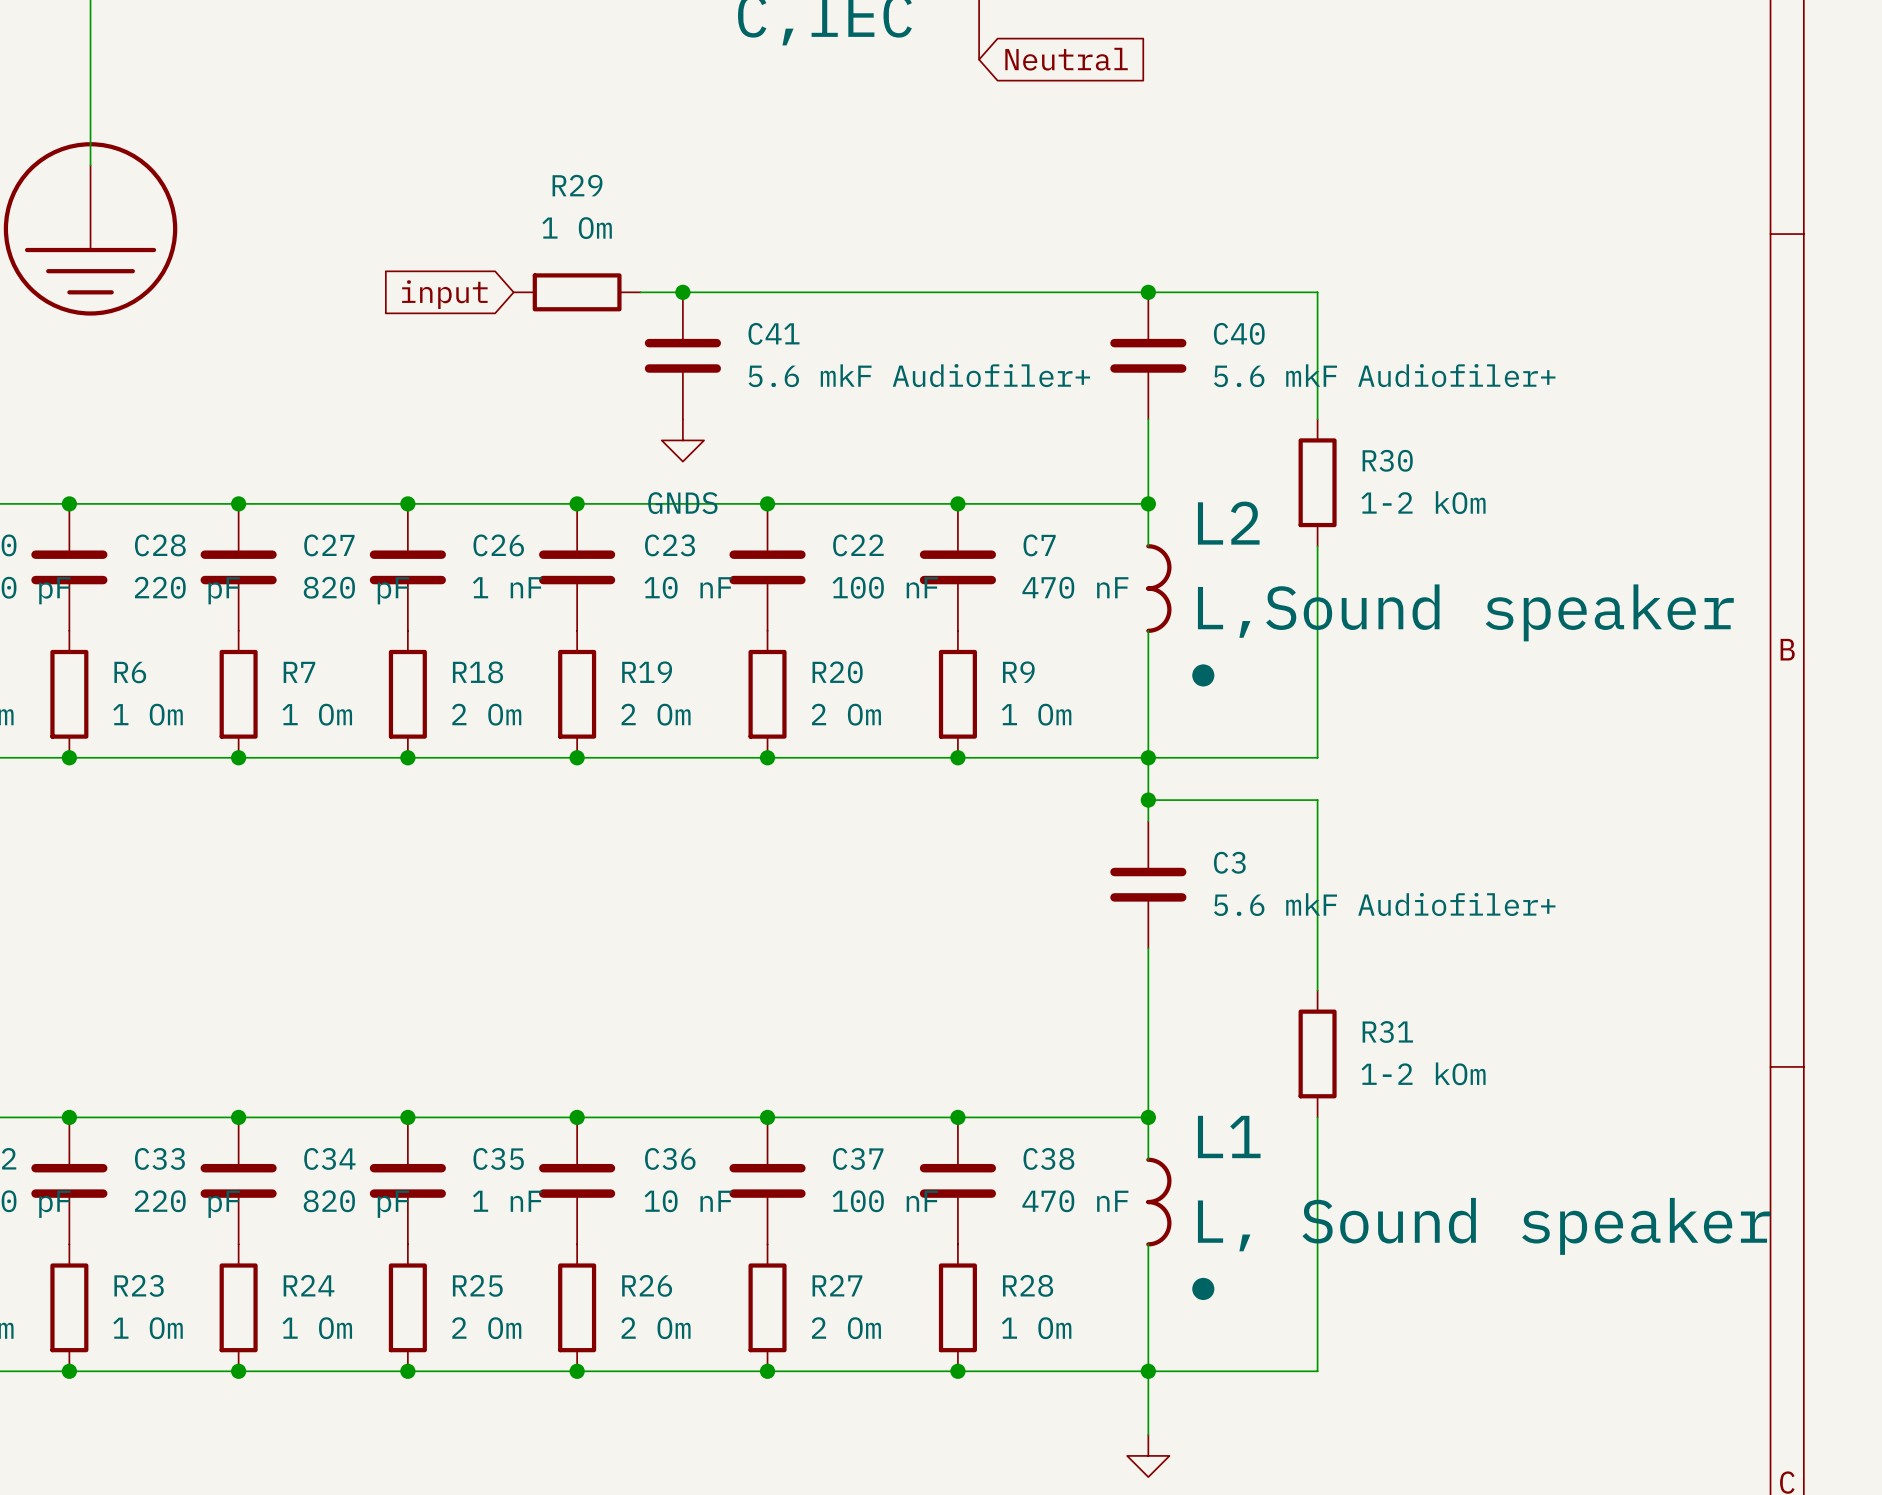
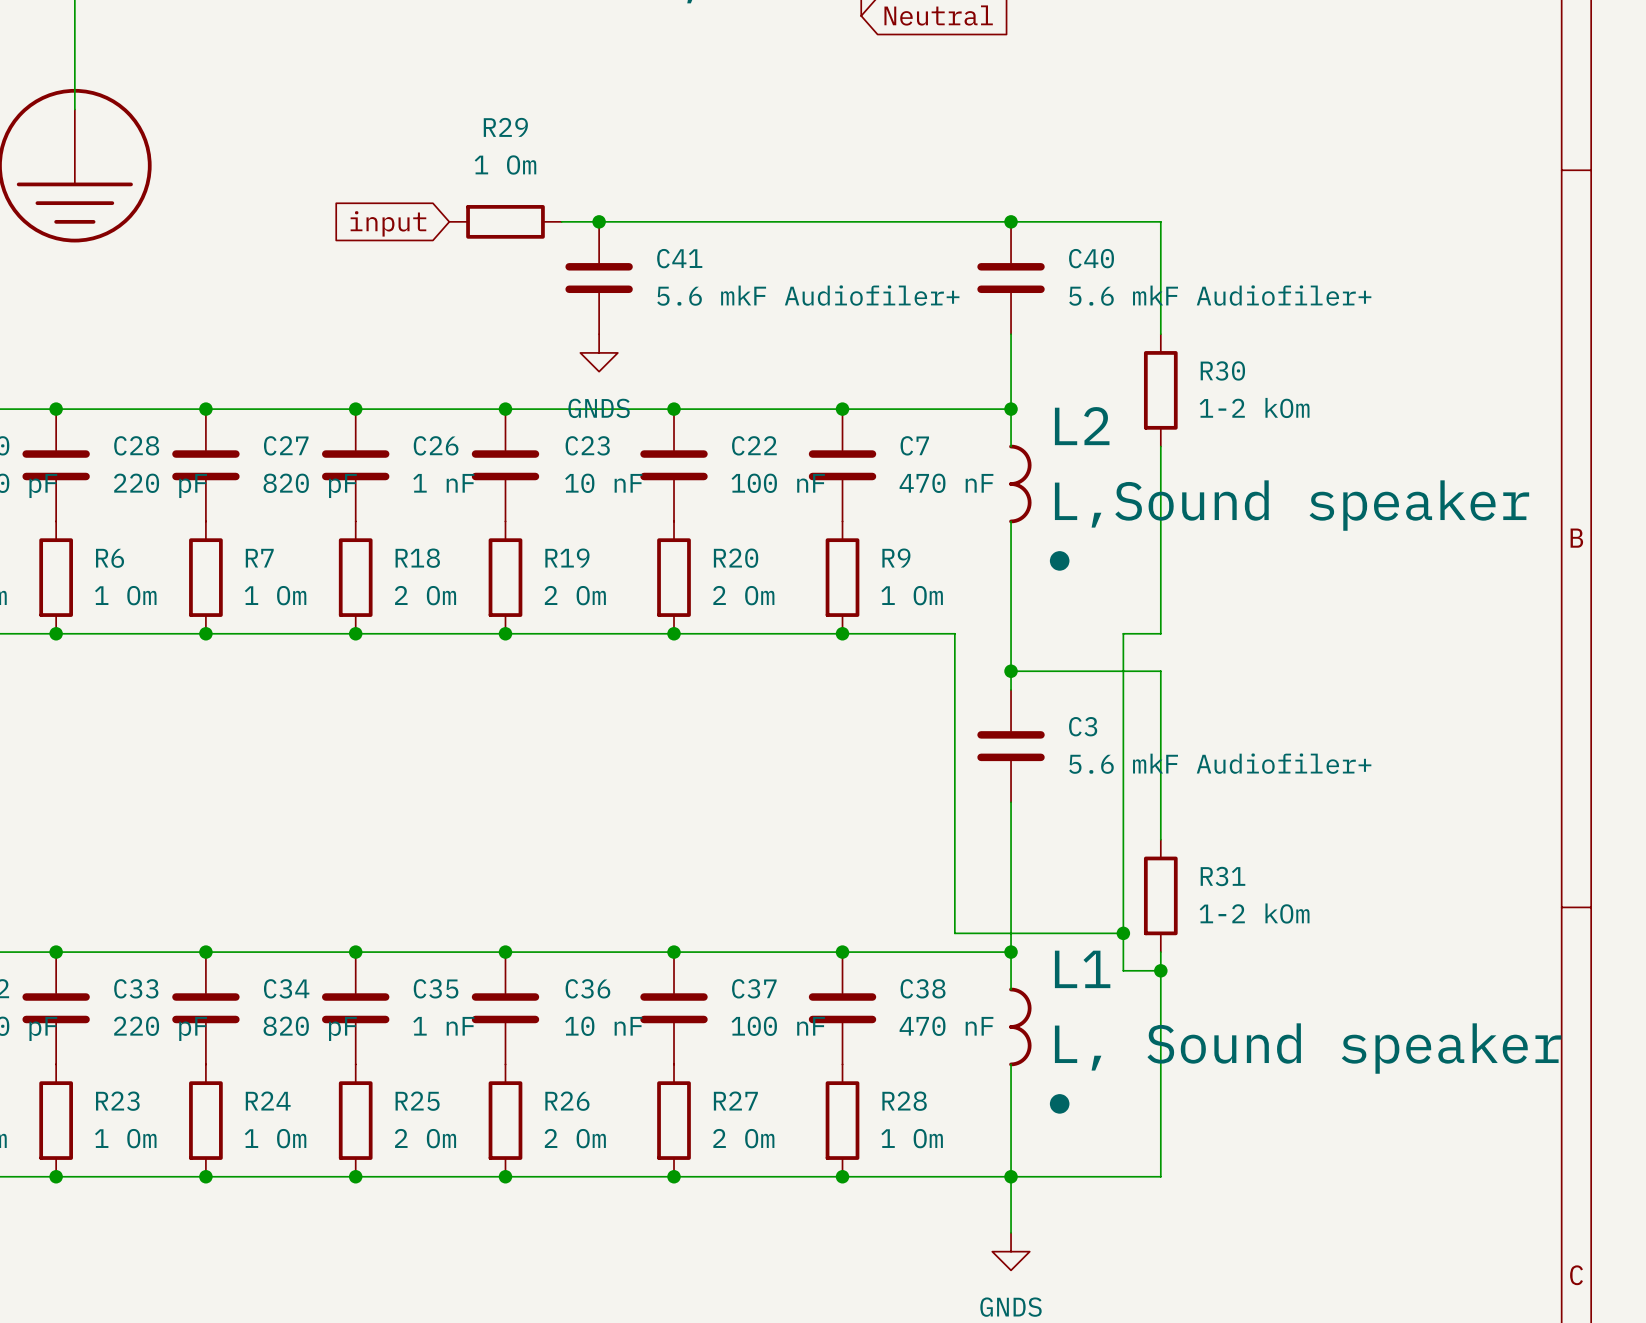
wire: (1084, 757) (1275, 757) -> (954, 633) (954, 933) (1123, 933)
junction: (1148, 757) -> none
wire: none -> (1123, 633) (1123, 970) (1160, 970)
junction: none -> (1123, 933)
junction: none -> (1160, 970)

